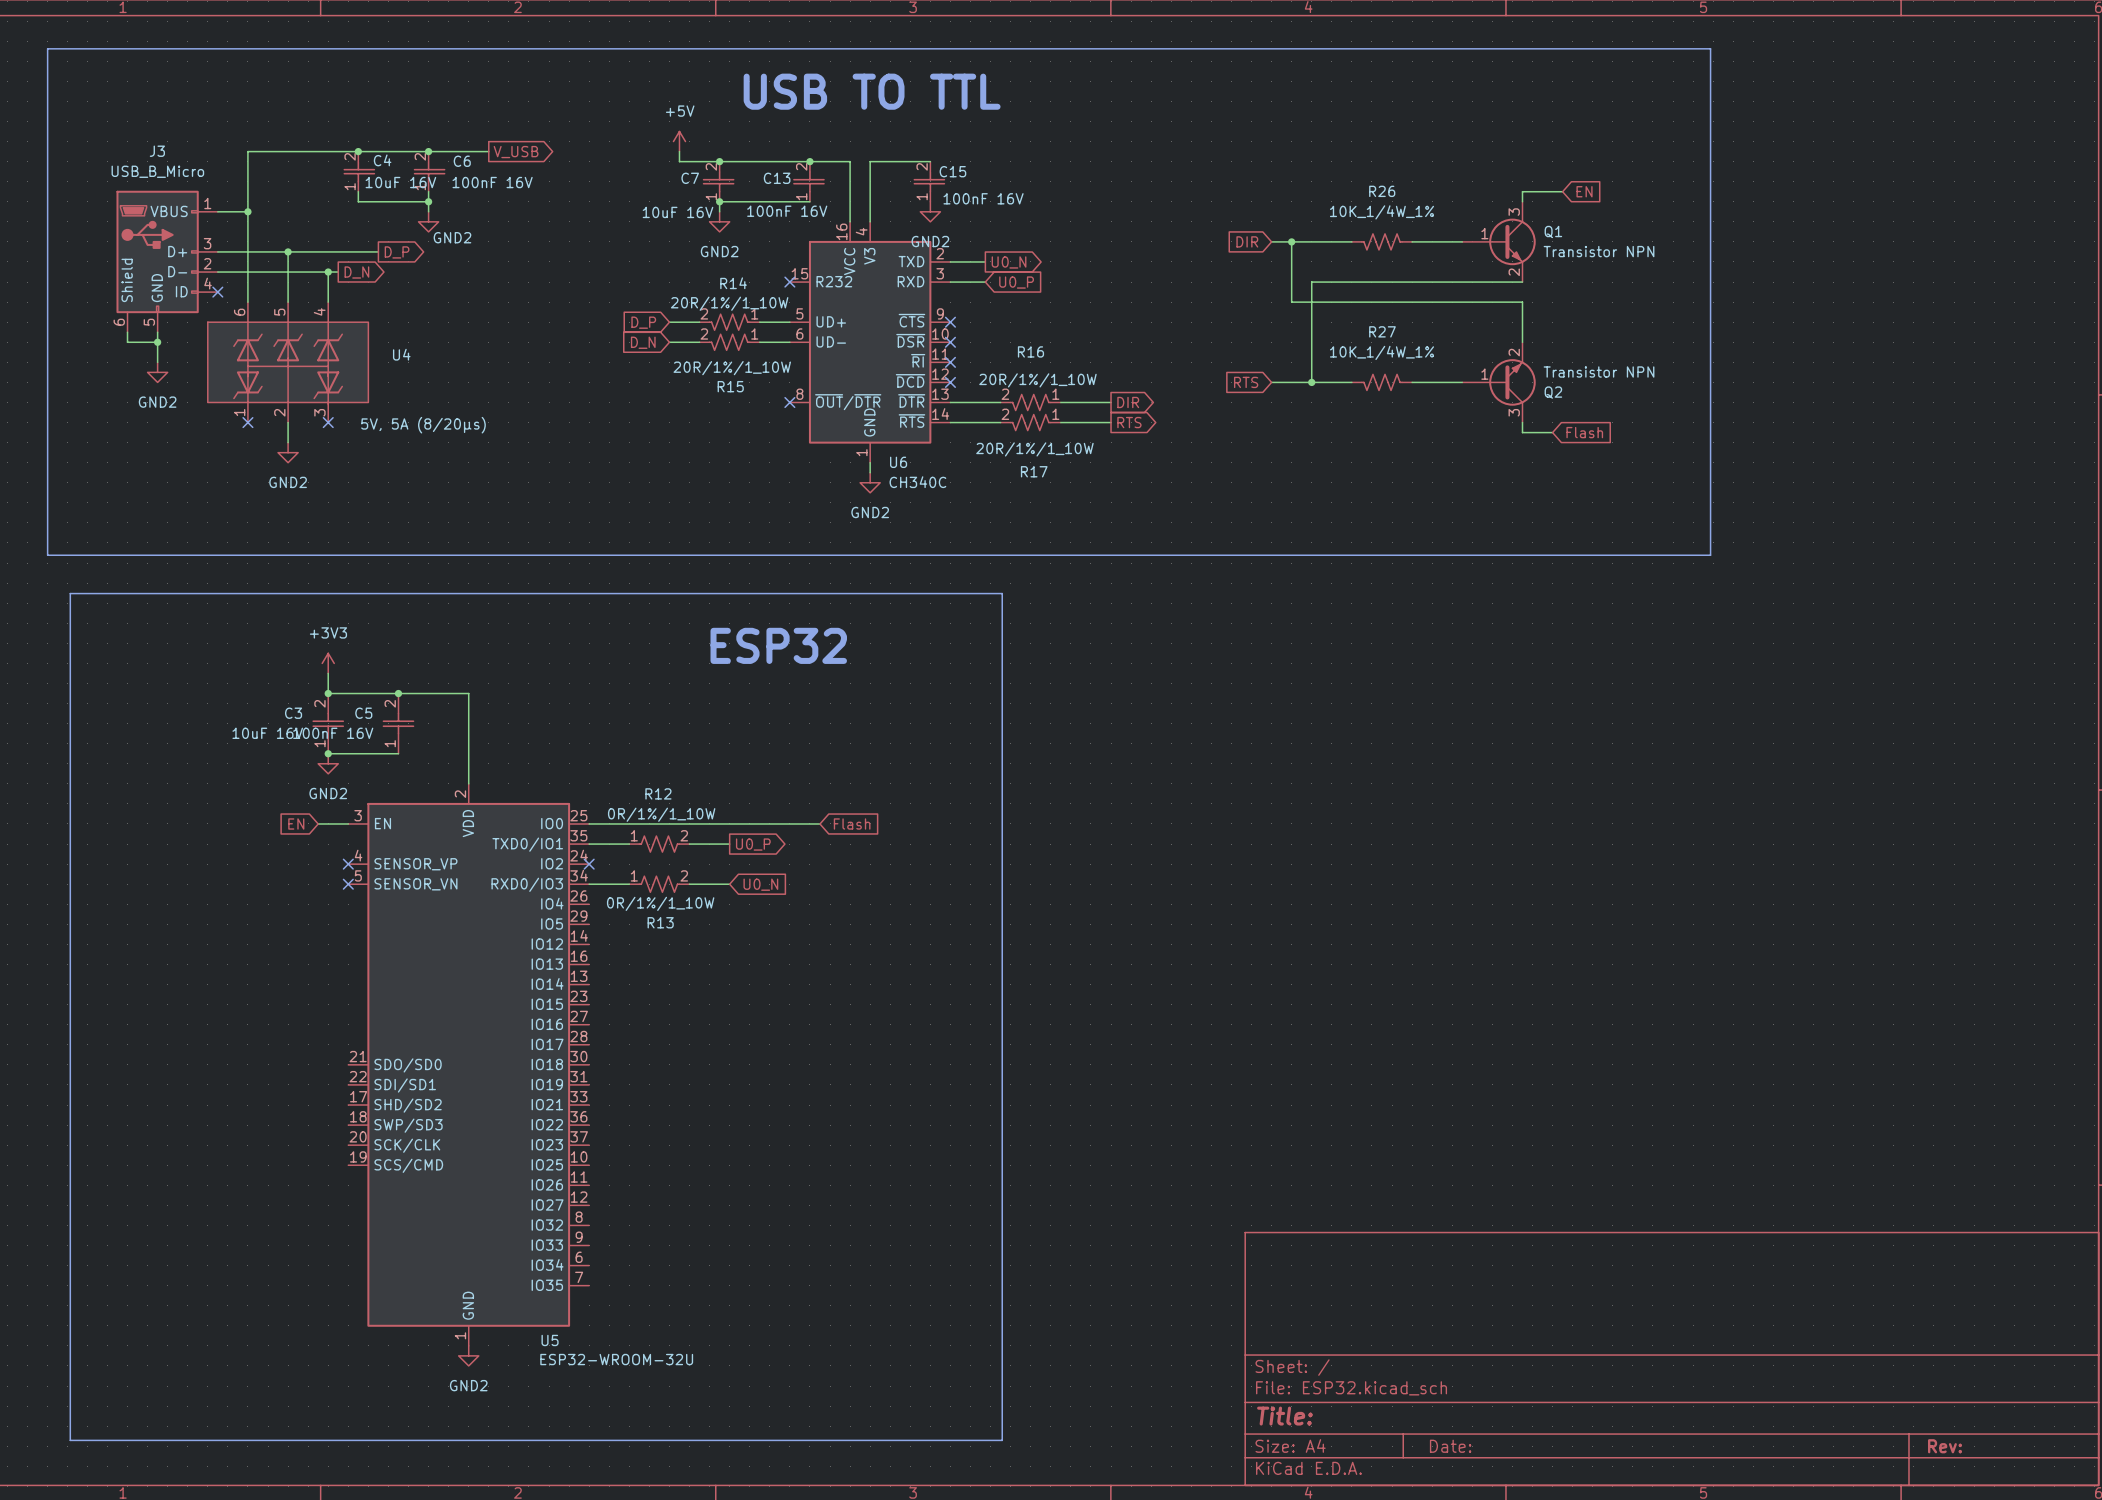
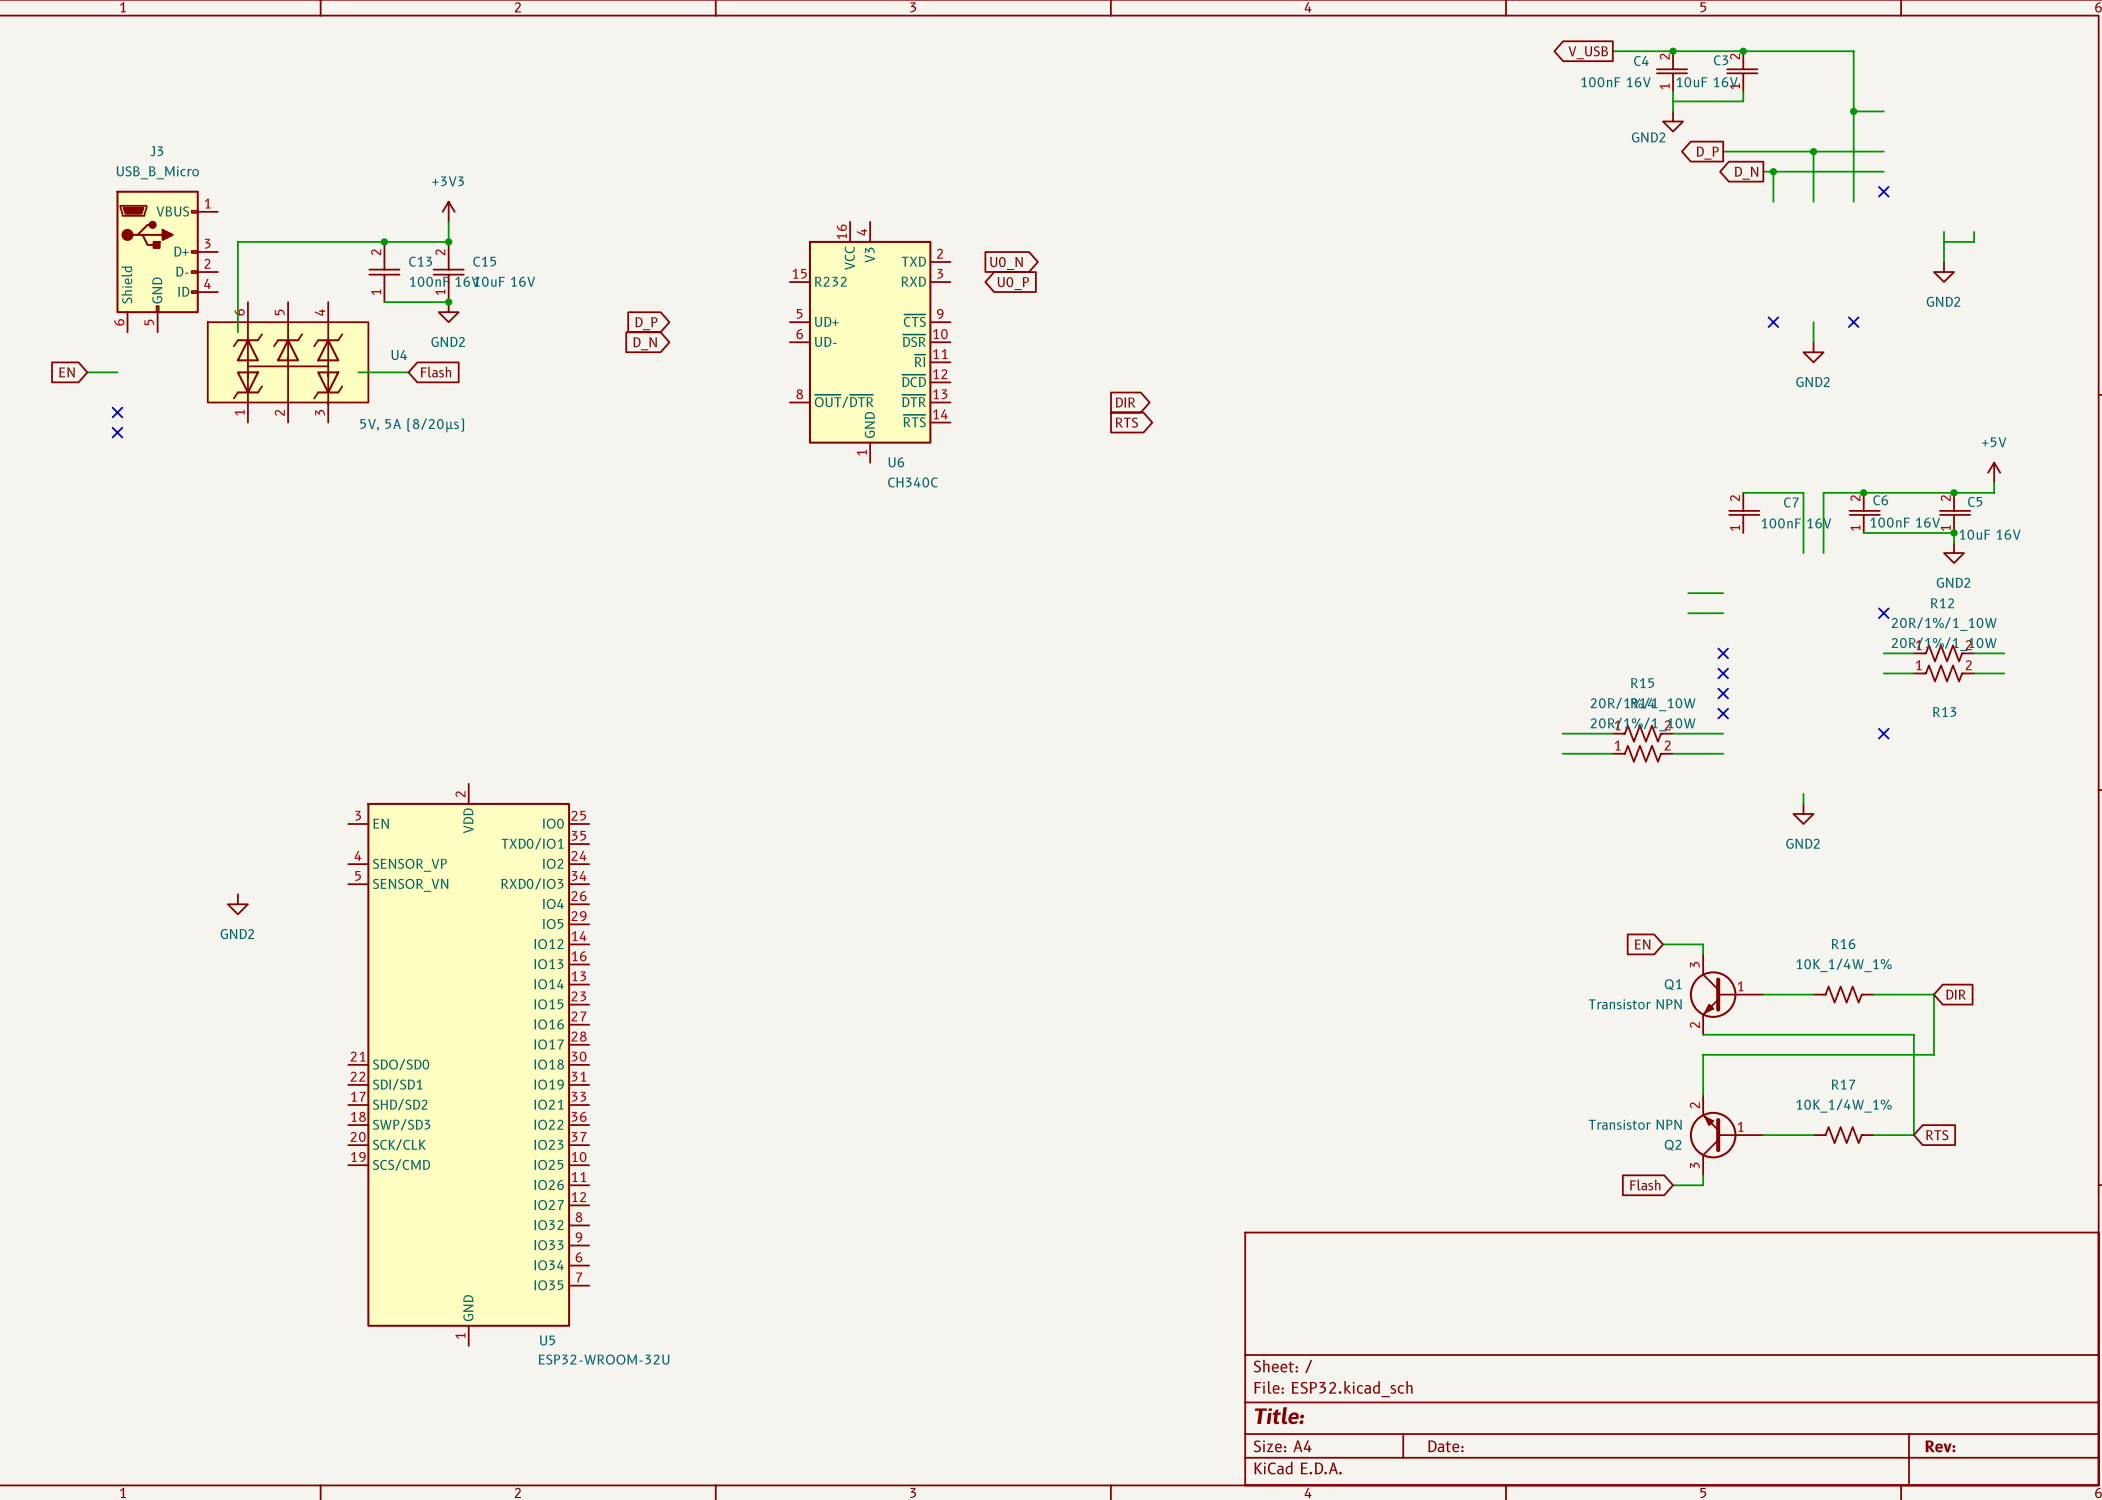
line: (47, 48) (1710, 48) (1710, 555) (47, 555) (47, 48) -> none
global label: none -> V_USB (1588, 52)
wire: none -> (1612, 51) (1853, 51) (1853, 201)
junction: none -> (1673, 51)
junction: none -> (1743, 51)
text: USB TO TTL (872, 91) -> none
wire: none -> (1673, 91) (1673, 111)
wire: none -> (1743, 91) (1743, 101) (1673, 101)
wire: none -> (1853, 111) (1883, 111)
junction: none -> (1853, 111)
power symbol: none -> GND2 (1673, 121)
power symbol: +5V (679, 141) -> none
junction: (358, 151) -> none
junction: (428, 151) -> none
wire: (488, 151) (247, 151) (247, 302) -> none
wire: (679, 151) (679, 161) (850, 161) (850, 221) -> none
wire: none -> (1723, 151) (1883, 151)
wire: none -> (1813, 151) (1813, 201)
junction: none -> (1813, 151)
global label: V_USB (516, 152) -> none
global label: none -> D_P (1707, 153)
C6 name position: C6 (462, 161) -> C6 (1880, 500)
junction: (719, 161) -> none
C13 symbol: [793, 161, 825, 202] -> [368, 241, 401, 303]
junction: (809, 161) -> none
C15 symbol: [913, 161, 946, 202] -> [432, 241, 465, 303]
wire: (930, 161) (870, 161) (870, 221) -> none
C4 flip: as is (359, 171) -> left-right (1672, 71)
C4 position: (359, 171) -> (1672, 71)
C6 position: (429, 171) -> (1864, 512)
C15 name position: C15 (952, 171) -> C15 (484, 261)
wire: none -> (1763, 171) (1883, 171)
wire: none -> (1773, 171) (1773, 201)
junction: none -> (1773, 171)
global label: none -> D_N (1746, 173)
C7 name position: C7 (690, 178) -> C7 (1791, 502)
C13 name position: C13 (777, 178) -> C13 (420, 261)
C7 flip: as is (718, 181) -> left-right (1744, 513)
C7 position: (718, 181) -> (1744, 512)
C4 value: 10uF 16V (400, 182) -> 100nF 16V (1615, 82)
C6 value position: 100nF 16V (492, 182) -> 100nF 16V (1905, 522)
wire: (358, 191) (358, 201) (428, 201) -> none
wire: (428, 191) (428, 211) -> none
wire: (1562, 191) (1522, 191) (1522, 201) -> none
global label: EN (1584, 191) -> none
no-connect mark: none -> (1883, 191)
C15 value: 100nF 16V (983, 198) -> 10uF 16V (504, 281)
junction: (428, 201) -> none
junction: (719, 201) -> none
wire: (809, 201) (719, 201) (719, 211) -> none
wire: (217, 211) (247, 211) -> none
junction: (247, 211) -> none
power symbol: none -> +3V3 (448, 211)
C13 value position: 100nF 16V (787, 211) -> 100nF 16V (444, 281)
power symbol: GND2 (930, 211) -> none
C7 value: 10uF 16V (678, 212) -> 100nF 16V (1796, 523)
power symbol position: GND2 (428, 221) -> GND2 (448, 312)
wire: none -> (448, 221) (448, 241) (237, 241) (237, 332)
power symbol: GND2 (719, 221) -> none
wire: none -> (1943, 231) (1943, 261)
wire: none -> (1974, 231) (1974, 241) (1943, 241)
power symbol text position: GND2 (452, 237) -> GND2 (448, 341)
junction: none -> (384, 241)
junction: none -> (448, 241)
global label: DIR (1247, 241) -> none
wire: (1271, 241) (1351, 241) -> none
wire: (1291, 241) (1291, 302) (1522, 302) (1522, 342) -> none
junction: (1291, 241) -> none
R26: 10K_1/4W_1% (1381, 241) -> none
wire: (1412, 241) (1462, 241) -> none
Q1 position: (1499, 241) -> (1726, 994)
Q1 flip: as is (1512, 241) -> left-right (1713, 994)
wire: (217, 251) (378, 251) -> none
wire: (288, 251) (288, 302) -> none
junction: (288, 251) -> none
global label: D_P (397, 252) -> none
wire: (950, 261) (985, 261) -> none
wire: (217, 272) (338, 272) -> none
wire: (328, 272) (328, 302) -> none
junction: (328, 272) -> none
global label: D_N (356, 272) -> none
power symbol: none -> GND2 (1943, 272)
no-connect mark: (789, 282) -> none
wire: (950, 282) (985, 282) -> none
wire: (1522, 282) (1311, 282) (1311, 382) -> none
no-connect mark: (217, 292) -> none
wire: none -> (384, 302) (448, 302)
junction: none -> (448, 302)
wire: (669, 322) (699, 322) -> none
R14 flip: as is (729, 322) -> left-right (1642, 753)
R14 position: (729, 322) -> (1642, 753)
wire: (759, 322) (789, 322) -> none
no-connect mark: (950, 322) -> none
no-connect mark: none -> (1773, 322)
wire: none -> (1813, 322) (1813, 342)
no-connect mark: none -> (1853, 322)
wire: (127, 332) (127, 342) (157, 342) -> none
wire: (157, 332) (157, 362) -> none
junction: (157, 342) -> none
wire: (669, 342) (699, 342) -> none
R15 flip: as is (729, 342) -> left-right (1642, 733)
R15 position: (729, 342) -> (1642, 733)
wire: (759, 342) (789, 342) -> none
no-connect mark: (950, 342) -> none
power symbol: none -> GND2 (1813, 352)
no-connect mark: (950, 362) -> none
R15 value position: 20R/1%/1_10W (732, 368) -> 20R/1%/1_10W (1643, 704)
global label: none -> EN (67, 372)
wire: none -> (87, 372) (117, 372)
power symbol: GND2 (157, 372) -> none
wire: none -> (358, 372) (408, 372)
global label: none -> Flash (436, 372)
R16 value: 20R/1%/1_10W (1037, 380) -> 10K_1/4W_1% (1844, 965)
no-connect mark: (950, 382) -> none
global label: RTS (1246, 382) -> none
wire: (1271, 382) (1351, 382) -> none
junction: (1311, 382) -> none
R27: 10K_1/4W_1% (1381, 382) -> none
wire: (1412, 382) (1462, 382) -> none
Q2 position: (1499, 382) -> (1726, 1135)
Q2 flip: as is (1512, 382) -> left-right (1713, 1135)
R15 name position: R15 (730, 386) -> R15 (1642, 683)
R16 symbol: [1000, 394, 1061, 411] -> [1813, 986, 1874, 1003]
no-connect mark: (789, 402) -> none
wire: (950, 402) (1000, 402) -> none
wire: (1060, 402) (1111, 402) -> none
no-connect mark: none -> (117, 412)
R17 symbol: [1000, 414, 1061, 431] -> [1813, 1127, 1874, 1144]
no-connect mark: (247, 422) -> none
wire: (288, 422) (288, 442) -> none
no-connect mark: (328, 422) -> none
wire: (950, 422) (1000, 422) -> none
wire: (1060, 422) (1111, 422) -> none
wire: (1522, 422) (1522, 432) (1552, 432) -> none
no-connect mark: none -> (117, 432)
global label: Flash (1584, 432) -> none
R17 value: 20R/1%/1_10W (1034, 449) -> 10K_1/4W_1% (1844, 1105)
power symbol: GND2 (288, 452) -> none
wire: (870, 462) (870, 472) -> none
R17 name position: R17 (1034, 471) -> R17 (1843, 1084)
power symbol: none -> +5V (1994, 472)
power symbol: GND2 (870, 482) -> none
wire: none -> (1994, 482) (1994, 492) (1823, 492) (1823, 553)
wire: none -> (1743, 492) (1803, 492) (1803, 553)
junction: none -> (1863, 492)
junction: none -> (1954, 492)
wire: none -> (1863, 532) (1954, 532) (1954, 542)
junction: none -> (1954, 532)
power symbol: none -> GND2 (1954, 553)
line: (70, 593) (1002, 593) (1002, 1440) (70, 1440) (70, 593) -> none
wire: none -> (1688, 593) (1723, 593)
wire: none -> (1688, 613) (1723, 613)
no-connect mark: none -> (1883, 613)
text: ESP32 (778, 645) -> none
no-connect mark: none -> (1723, 653)
wire: none -> (1883, 653) (1913, 653)
wire: none -> (1974, 653) (2004, 653)
power symbol: +3V3 (328, 663) -> none
wire: (328, 673) (328, 693) (468, 693) (468, 783) -> none
no-connect mark: none -> (1723, 673)
wire: none -> (1883, 673) (1913, 673)
wire: none -> (1974, 673) (2004, 673)
C3 symbol: [312, 693, 345, 754] -> [1726, 51, 1759, 92]
junction: (328, 693) -> none
C5 symbol: [382, 693, 415, 754] -> [1939, 492, 1971, 533]
junction: (398, 693) -> none
no-connect mark: none -> (1723, 693)
C5 name position: C5 (363, 713) -> C5 (1975, 501)
no-connect mark: none -> (1723, 713)
C3 value position: 10uF 16V (267, 733) -> 10uF 16V (1707, 82)
C5 value: 100nF 16V (333, 733) -> 10uF 16V (1990, 534)
wire: none -> (1562, 733) (1612, 733)
wire: none -> (1673, 733) (1723, 733)
no-connect mark: none -> (1883, 733)
wire: (328, 753) (398, 753) -> none
junction: (328, 753) -> none
wire: none -> (1562, 753) (1612, 753)
wire: none -> (1673, 753) (1723, 753)
power symbol position: GND2 (328, 763) -> GND2 (237, 904)
wire: none -> (1803, 793) (1803, 803)
power symbol: none -> GND2 (1803, 813)
R12 value: 0R/1%/1_10W (661, 814) -> 20R/1%/1_10W (1944, 624)
global label: EN (296, 823) -> none
wire: (318, 823) (348, 823) -> none
wire: (589, 823) (819, 823) -> none
global label: Flash (852, 823) -> none
wire: (589, 844) (629, 844) -> none
R12 position: (659, 844) -> (1943, 653)
wire: (689, 844) (729, 844) -> none
global label: U0_P (753, 844) -> none
no-connect mark: (348, 864) -> none
no-connect mark: (589, 864) -> none
no-connect mark: (348, 884) -> none
wire: (589, 884) (629, 884) -> none
R13 position: (659, 884) -> (1943, 673)
wire: (689, 884) (729, 884) -> none
global label: U0_N (760, 884) -> none
R13 value: 0R/1%/1_10W (660, 903) -> 20R/1%/1_10W (1944, 644)
global label: none -> EN (1642, 944)
wire: none -> (1662, 944) (1703, 944) (1703, 954)
wire: none -> (1763, 994) (1813, 994)
wire: none -> (1873, 994) (1933, 994) (1933, 1054) (1703, 1054) (1703, 1094)
global label: none -> DIR (1956, 994)
wire: none -> (1703, 1034) (1913, 1034) (1913, 1135) (1873, 1135)
wire: none -> (1763, 1135) (1813, 1135)
global label: none -> RTS (1937, 1135)
wire: none -> (1703, 1175) (1703, 1185) (1673, 1185)
global label: none -> Flash (1645, 1185)
power symbol: GND2 (468, 1355) -> none

